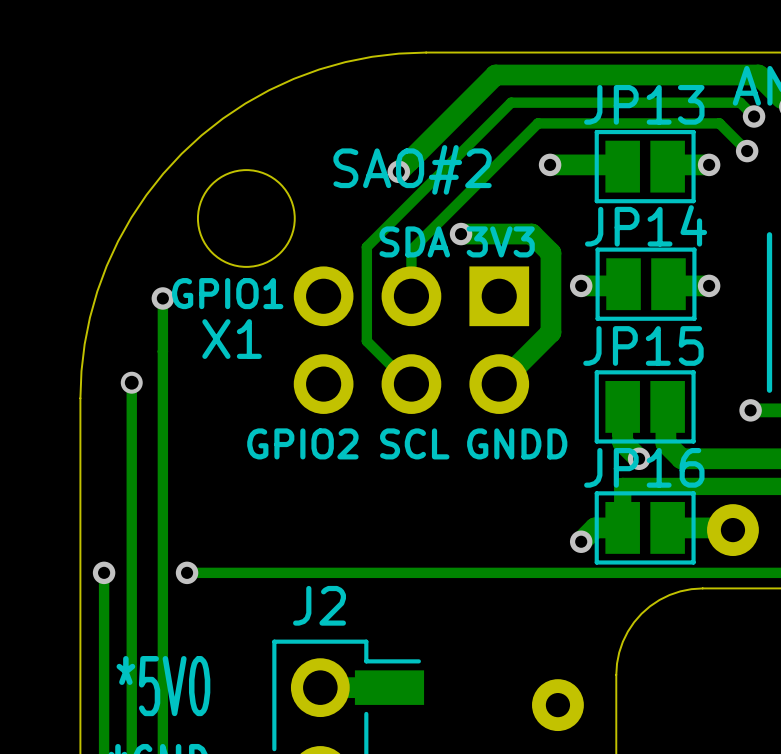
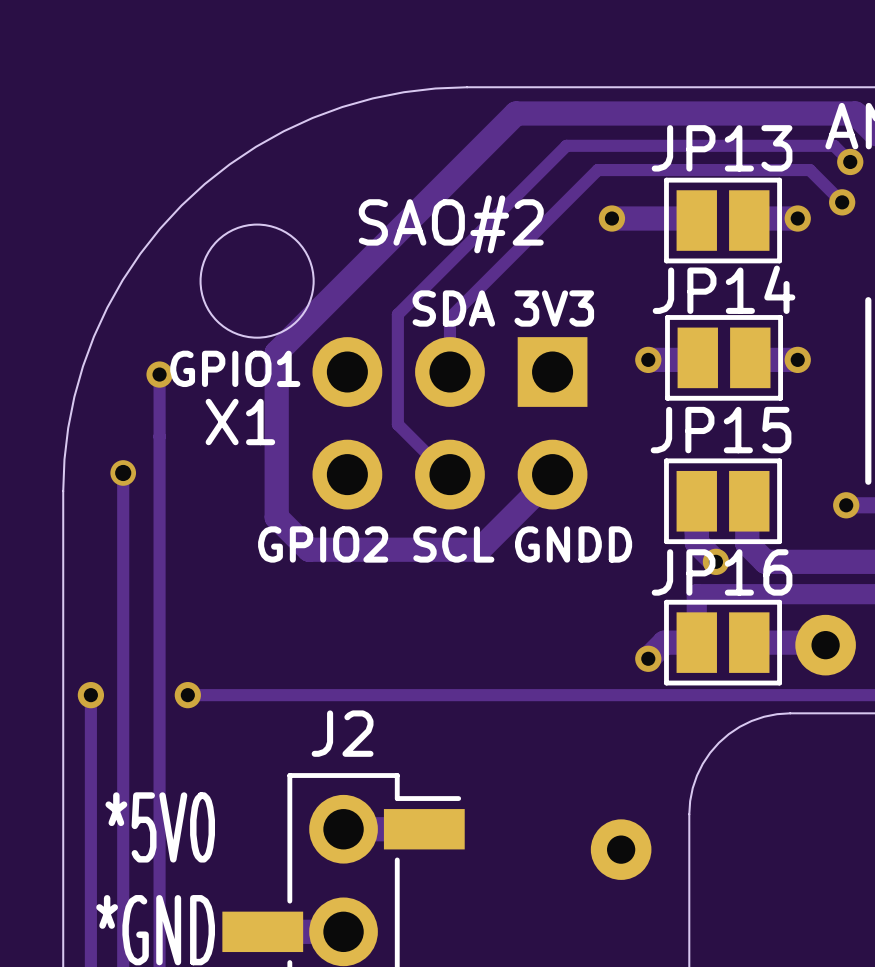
track: (495, 75) (398, 171) -> (548, 113) (516, 113) (276, 352) (276, 517) (309, 549) (479, 549) (552, 476)
via: (398, 171) -> none
track: (461, 234) (531, 234) (550, 253) (550, 332) (499, 384) -> none
via: (461, 234) -> none

